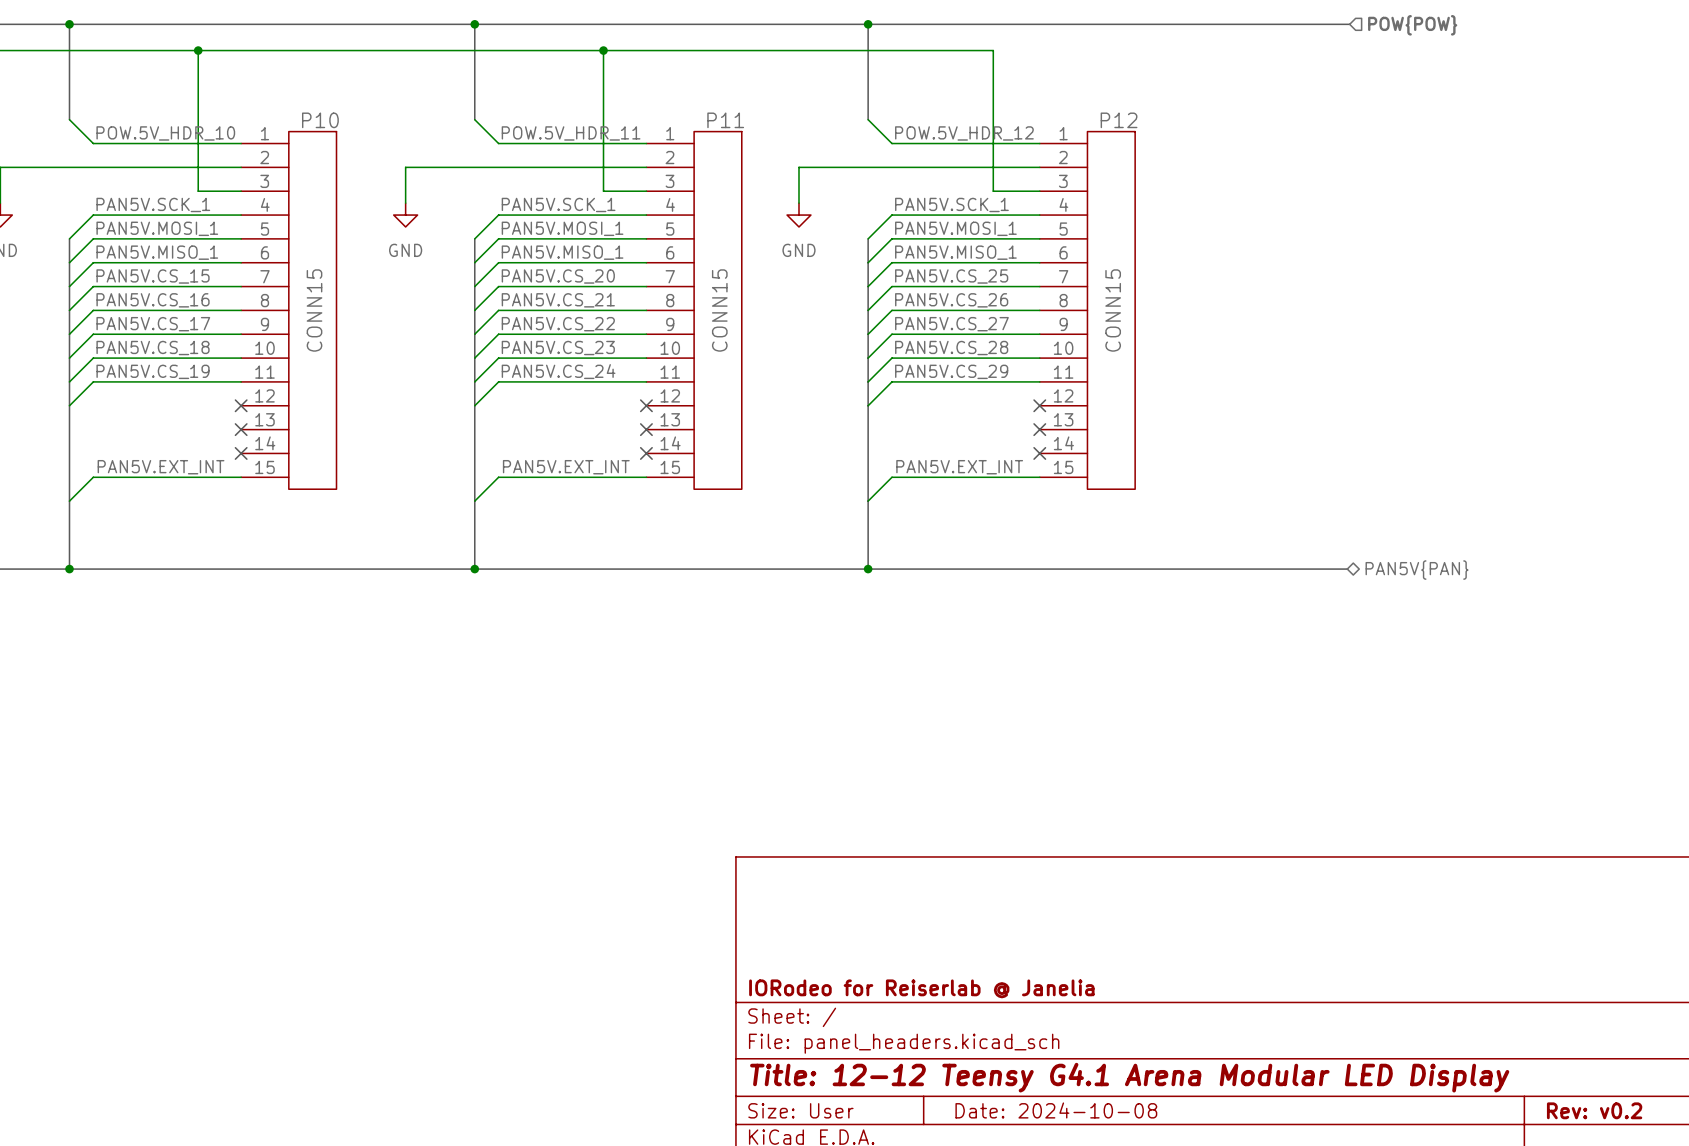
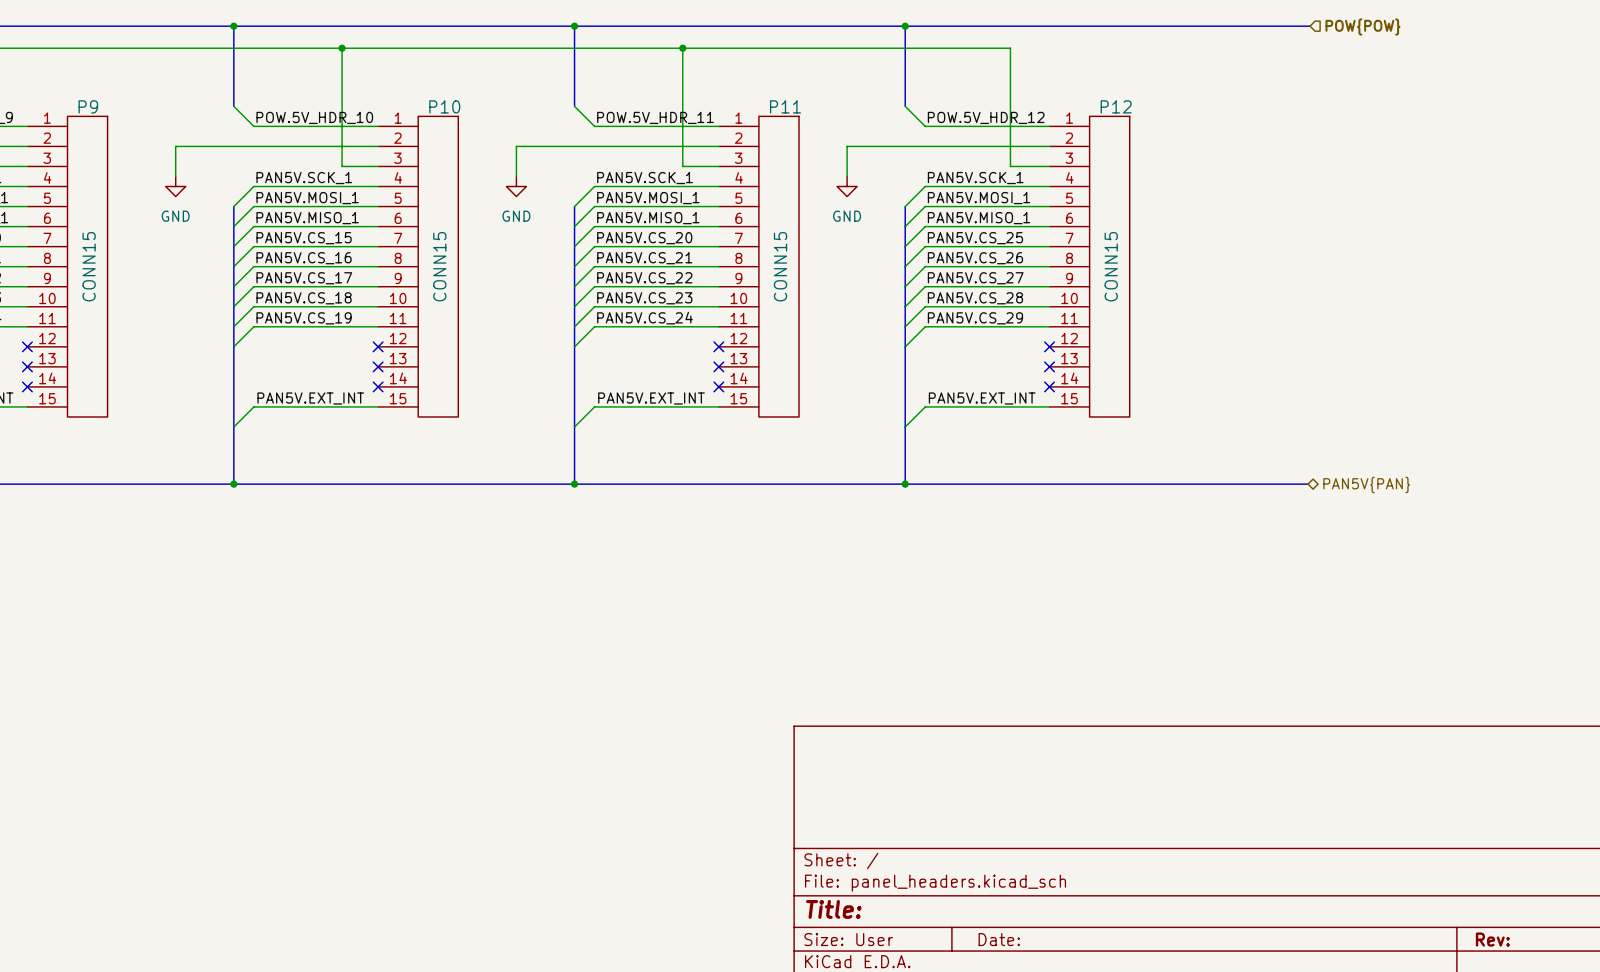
title block: IORodeo for Reiserlab @ Janelia (921, 988) -> none
title block: Title: 12-12 Teensy G4.1 Arena Modular LED Display (1129, 1077) -> Title: (833, 909)
title block: Date: 2024-10-08 (1056, 1110) -> Date: (999, 939)
title block: Rev: v0.2 (1594, 1110) -> Rev: (1492, 939)

